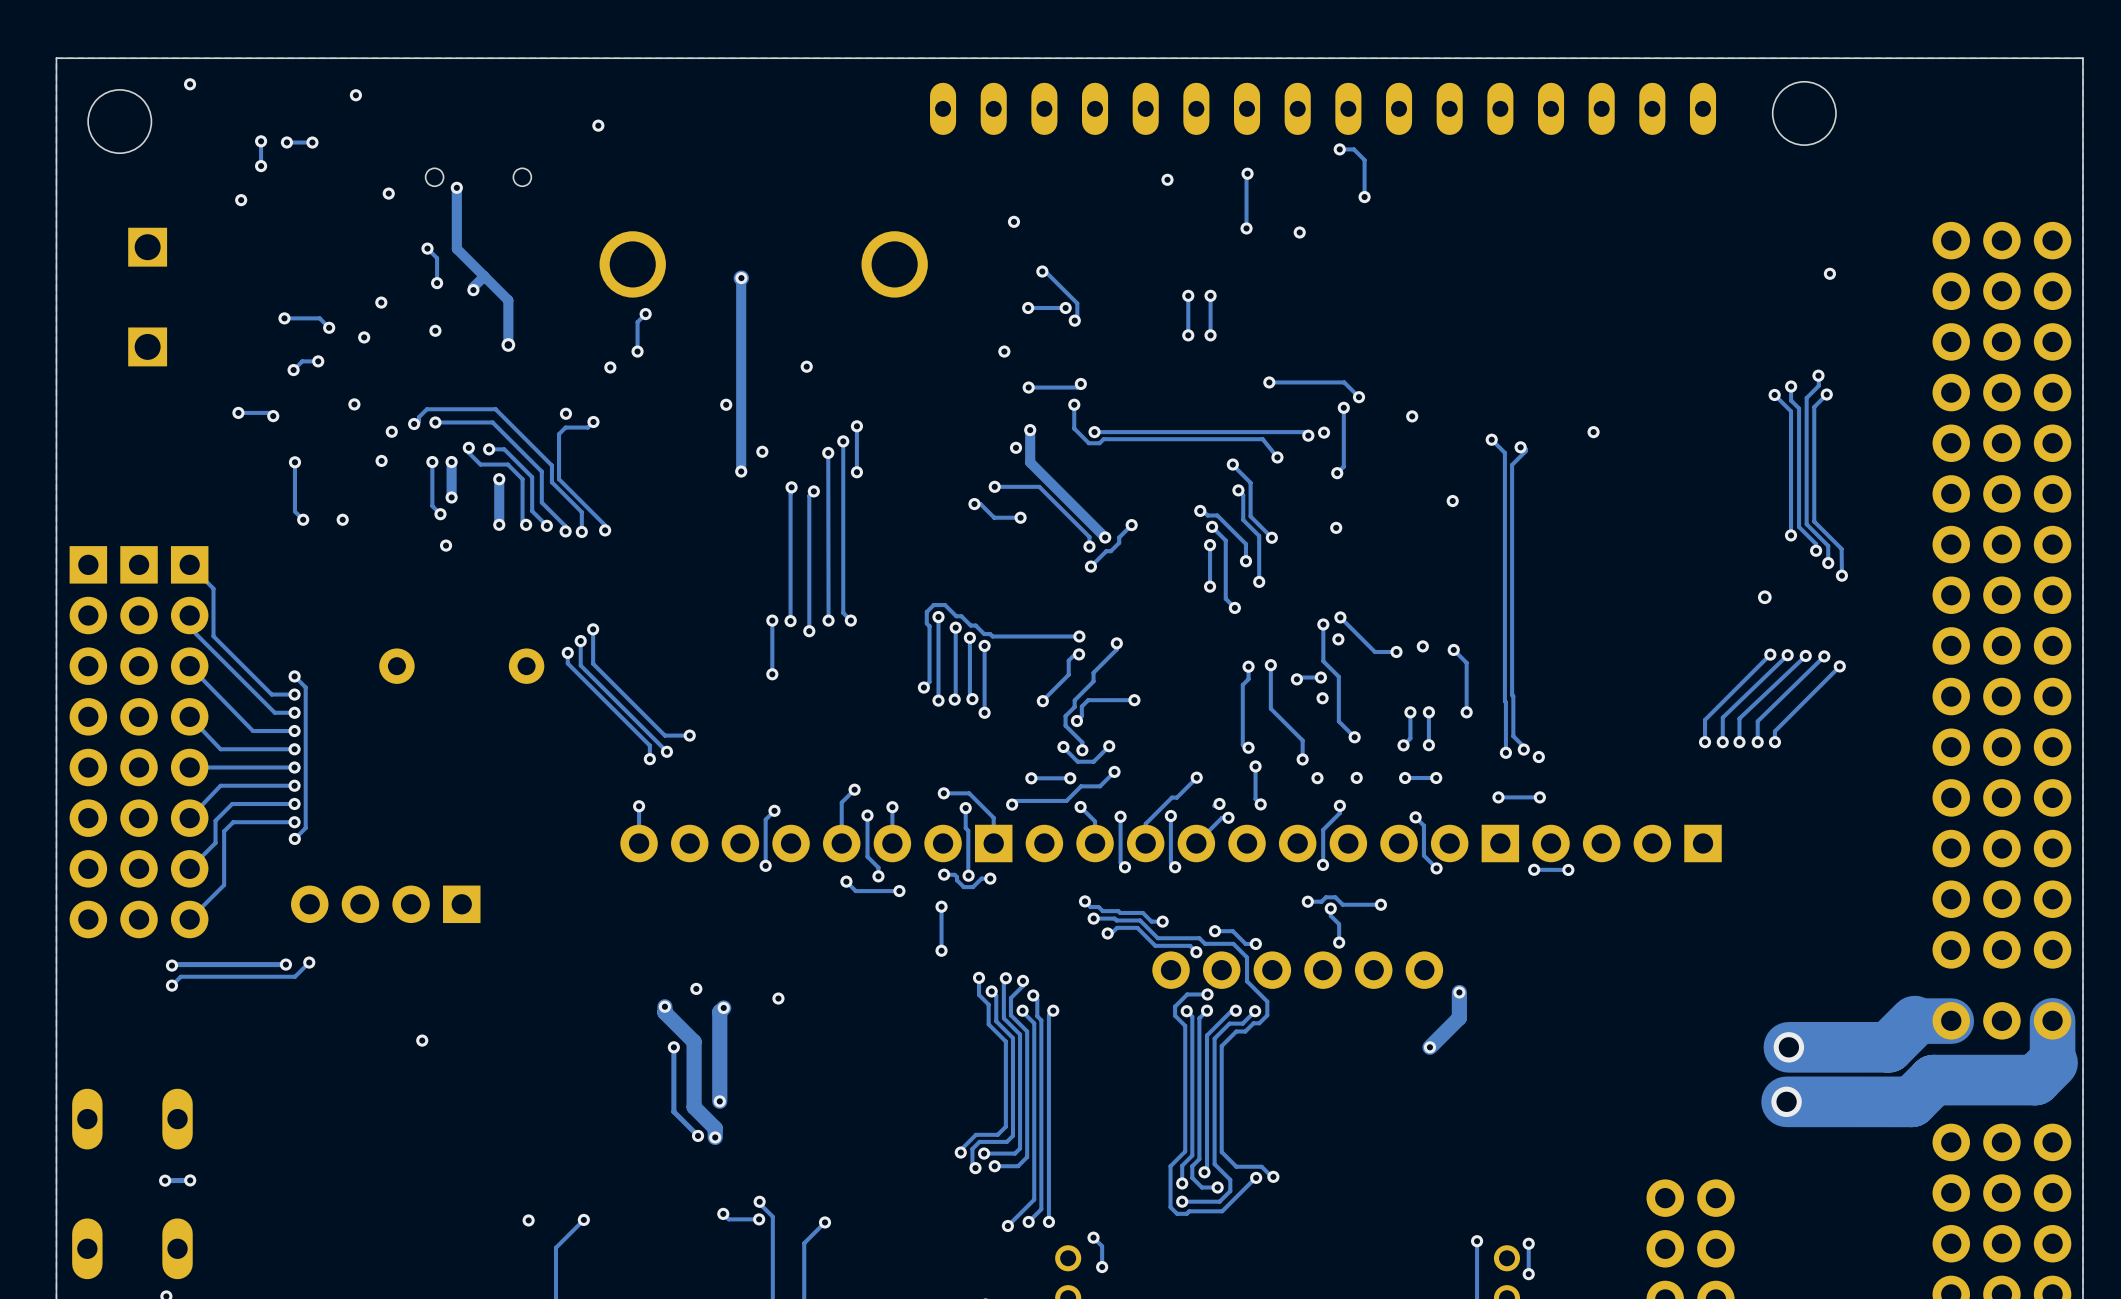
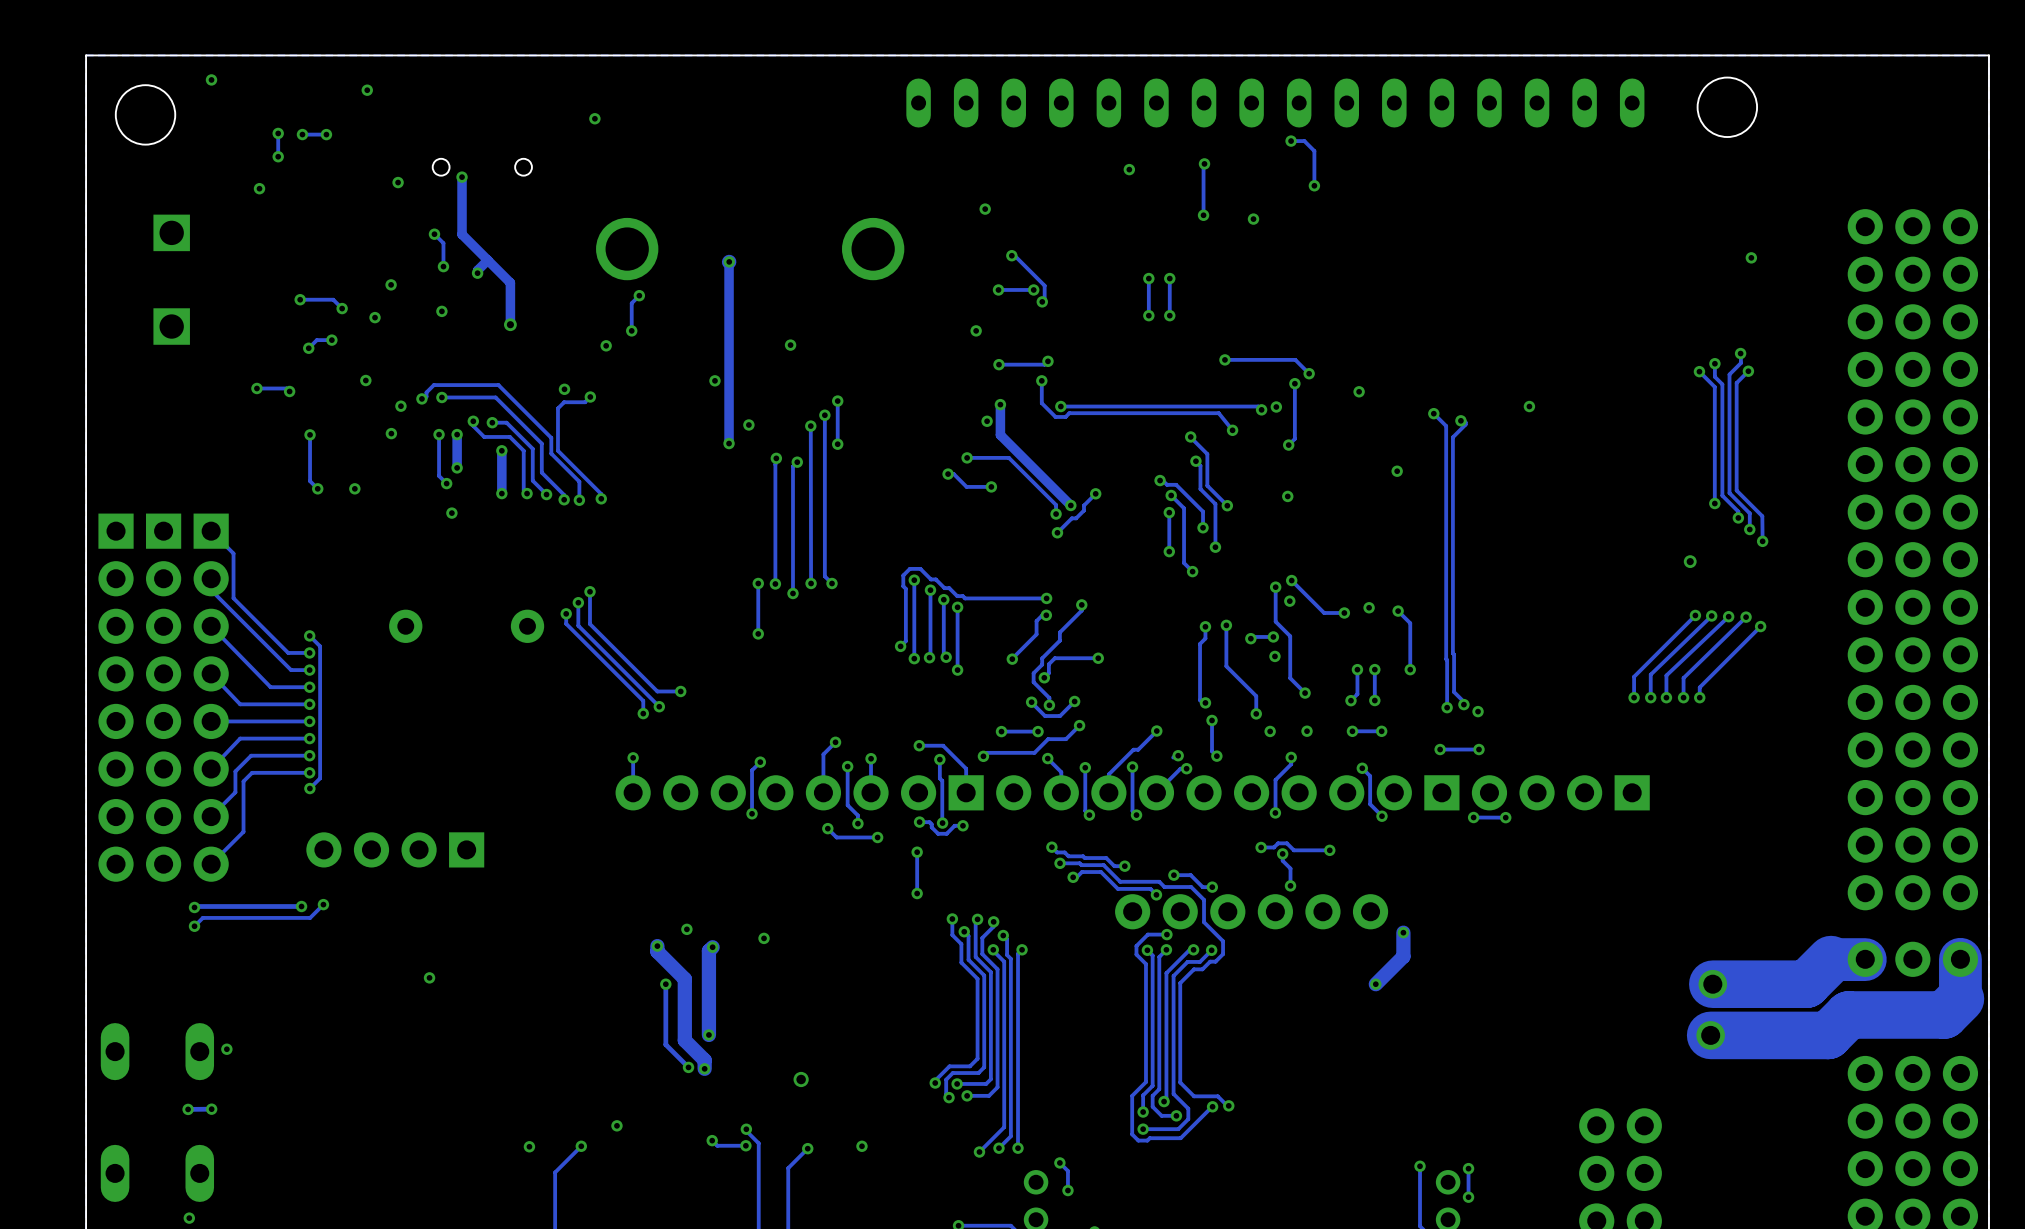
via: none -> (226, 1049)
via: none -> (801, 1079)
via: none -> (616, 1125)
via: none -> (861, 1146)

